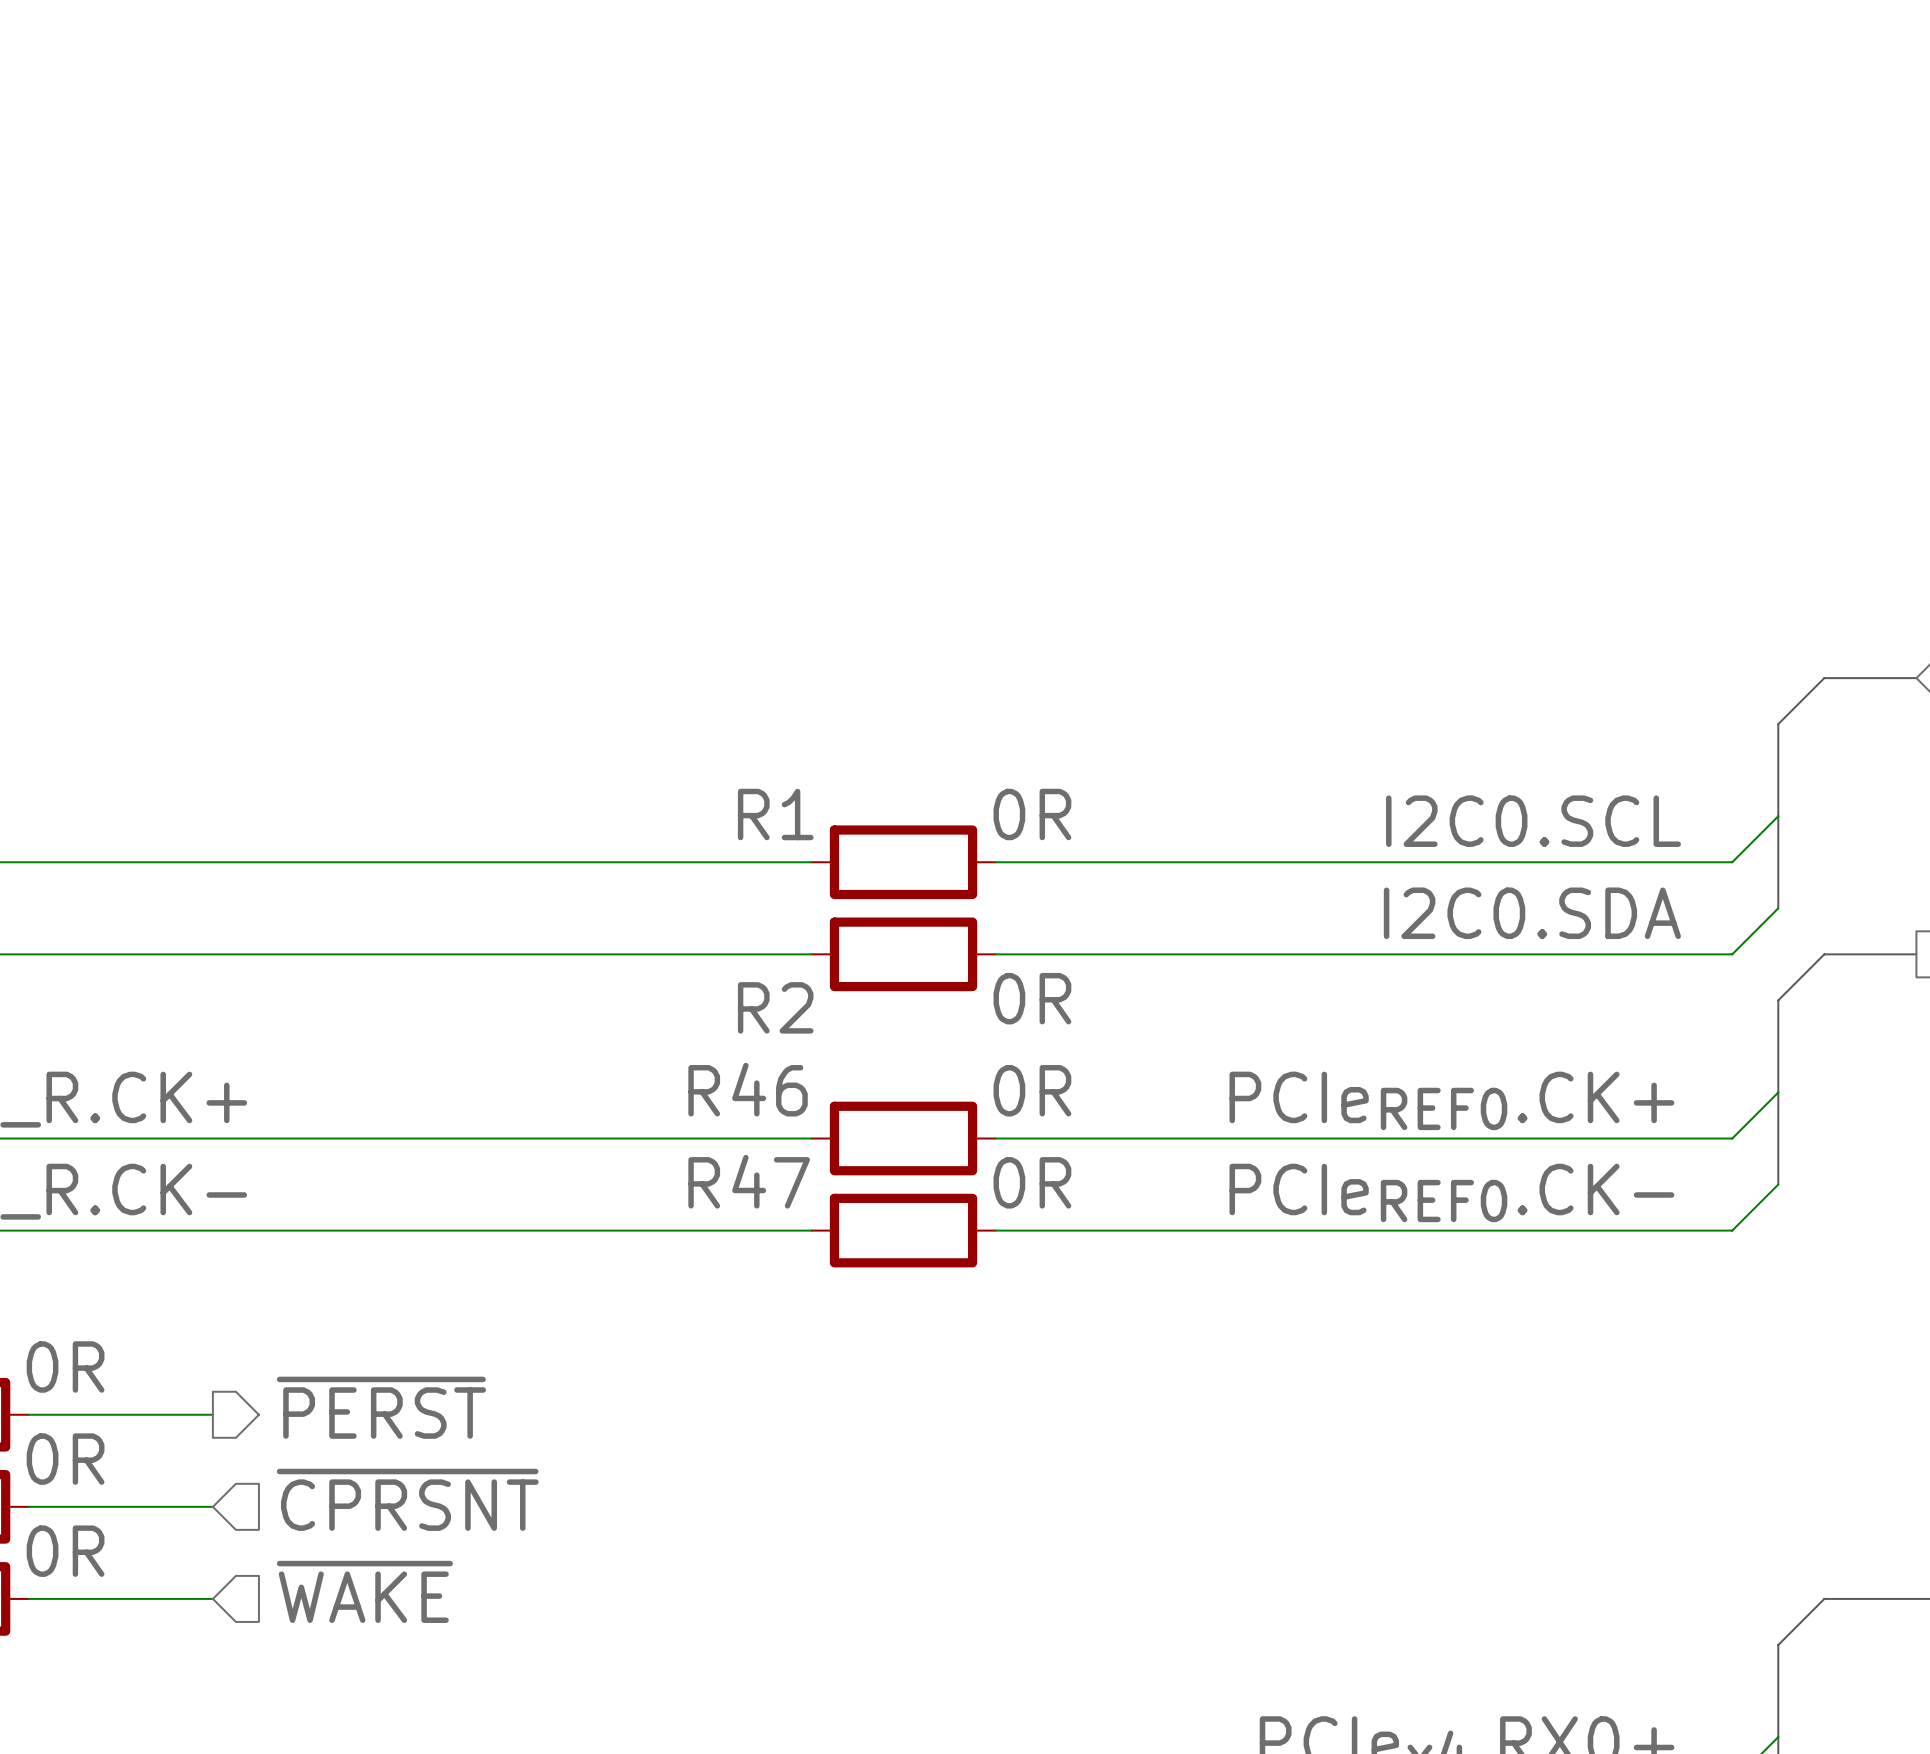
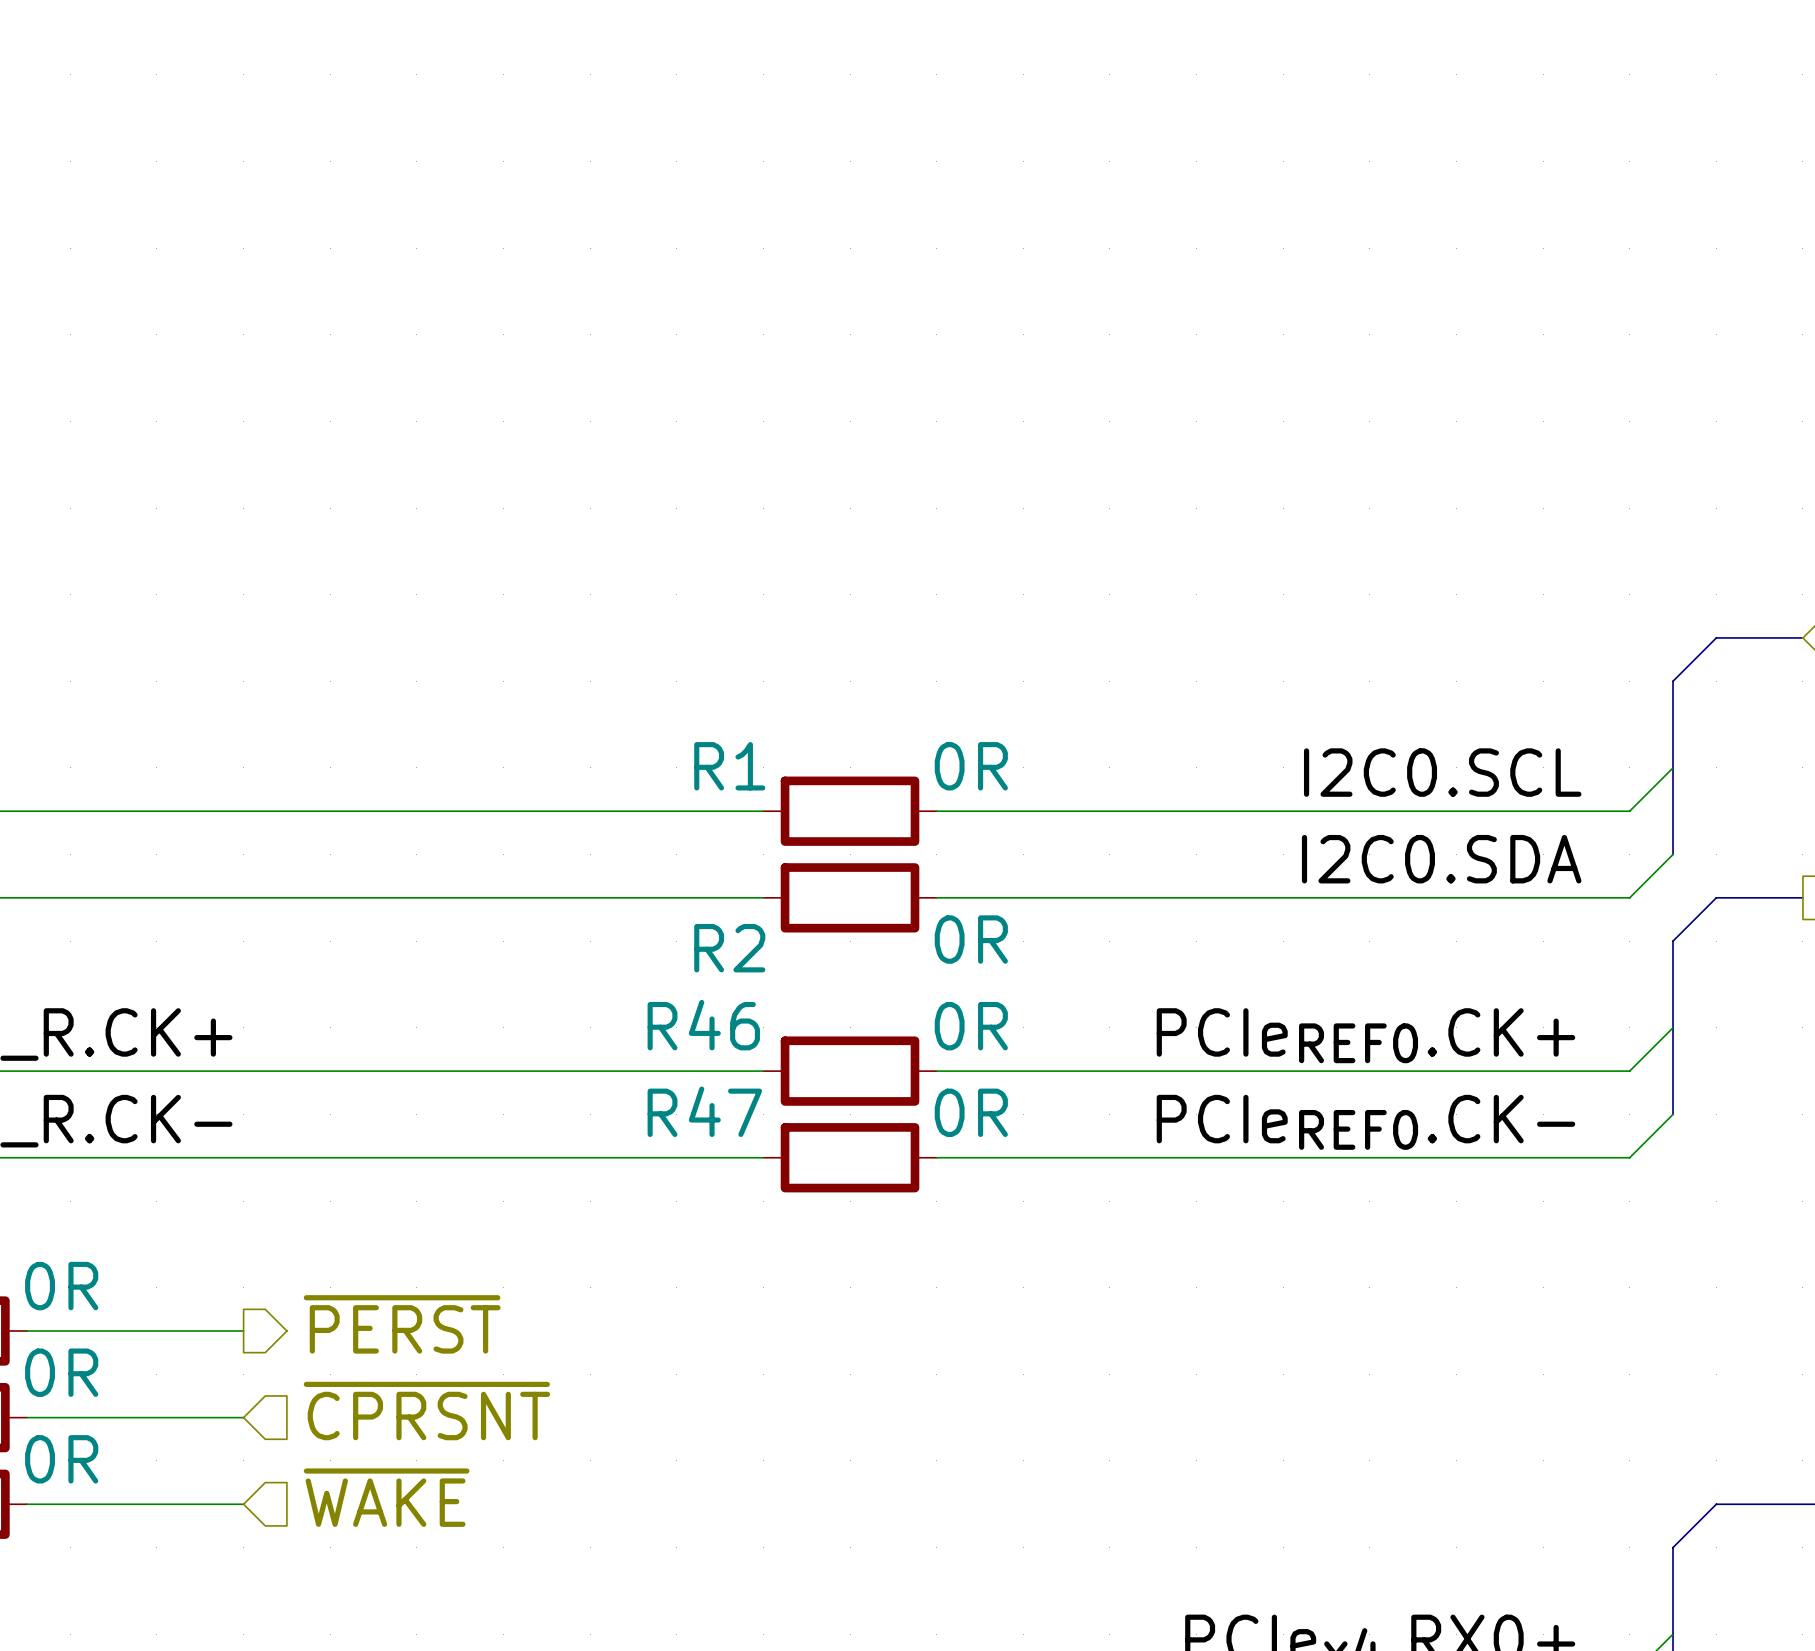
hierarchical label position: ~{PERST} (381, 1407) -> ~{PERST} (402, 1324)
wire: none -> (200, 1331) (243, 1331)
hierarchical label position: ~{CPRSNT} (407, 1499) -> ~{CPRSNT} (426, 1411)
wire: none -> (200, 1417) (243, 1417)
hierarchical label position: ~{WAKE} (364, 1591) -> ~{WAKE} (386, 1497)
wire: none -> (200, 1504) (243, 1504)

